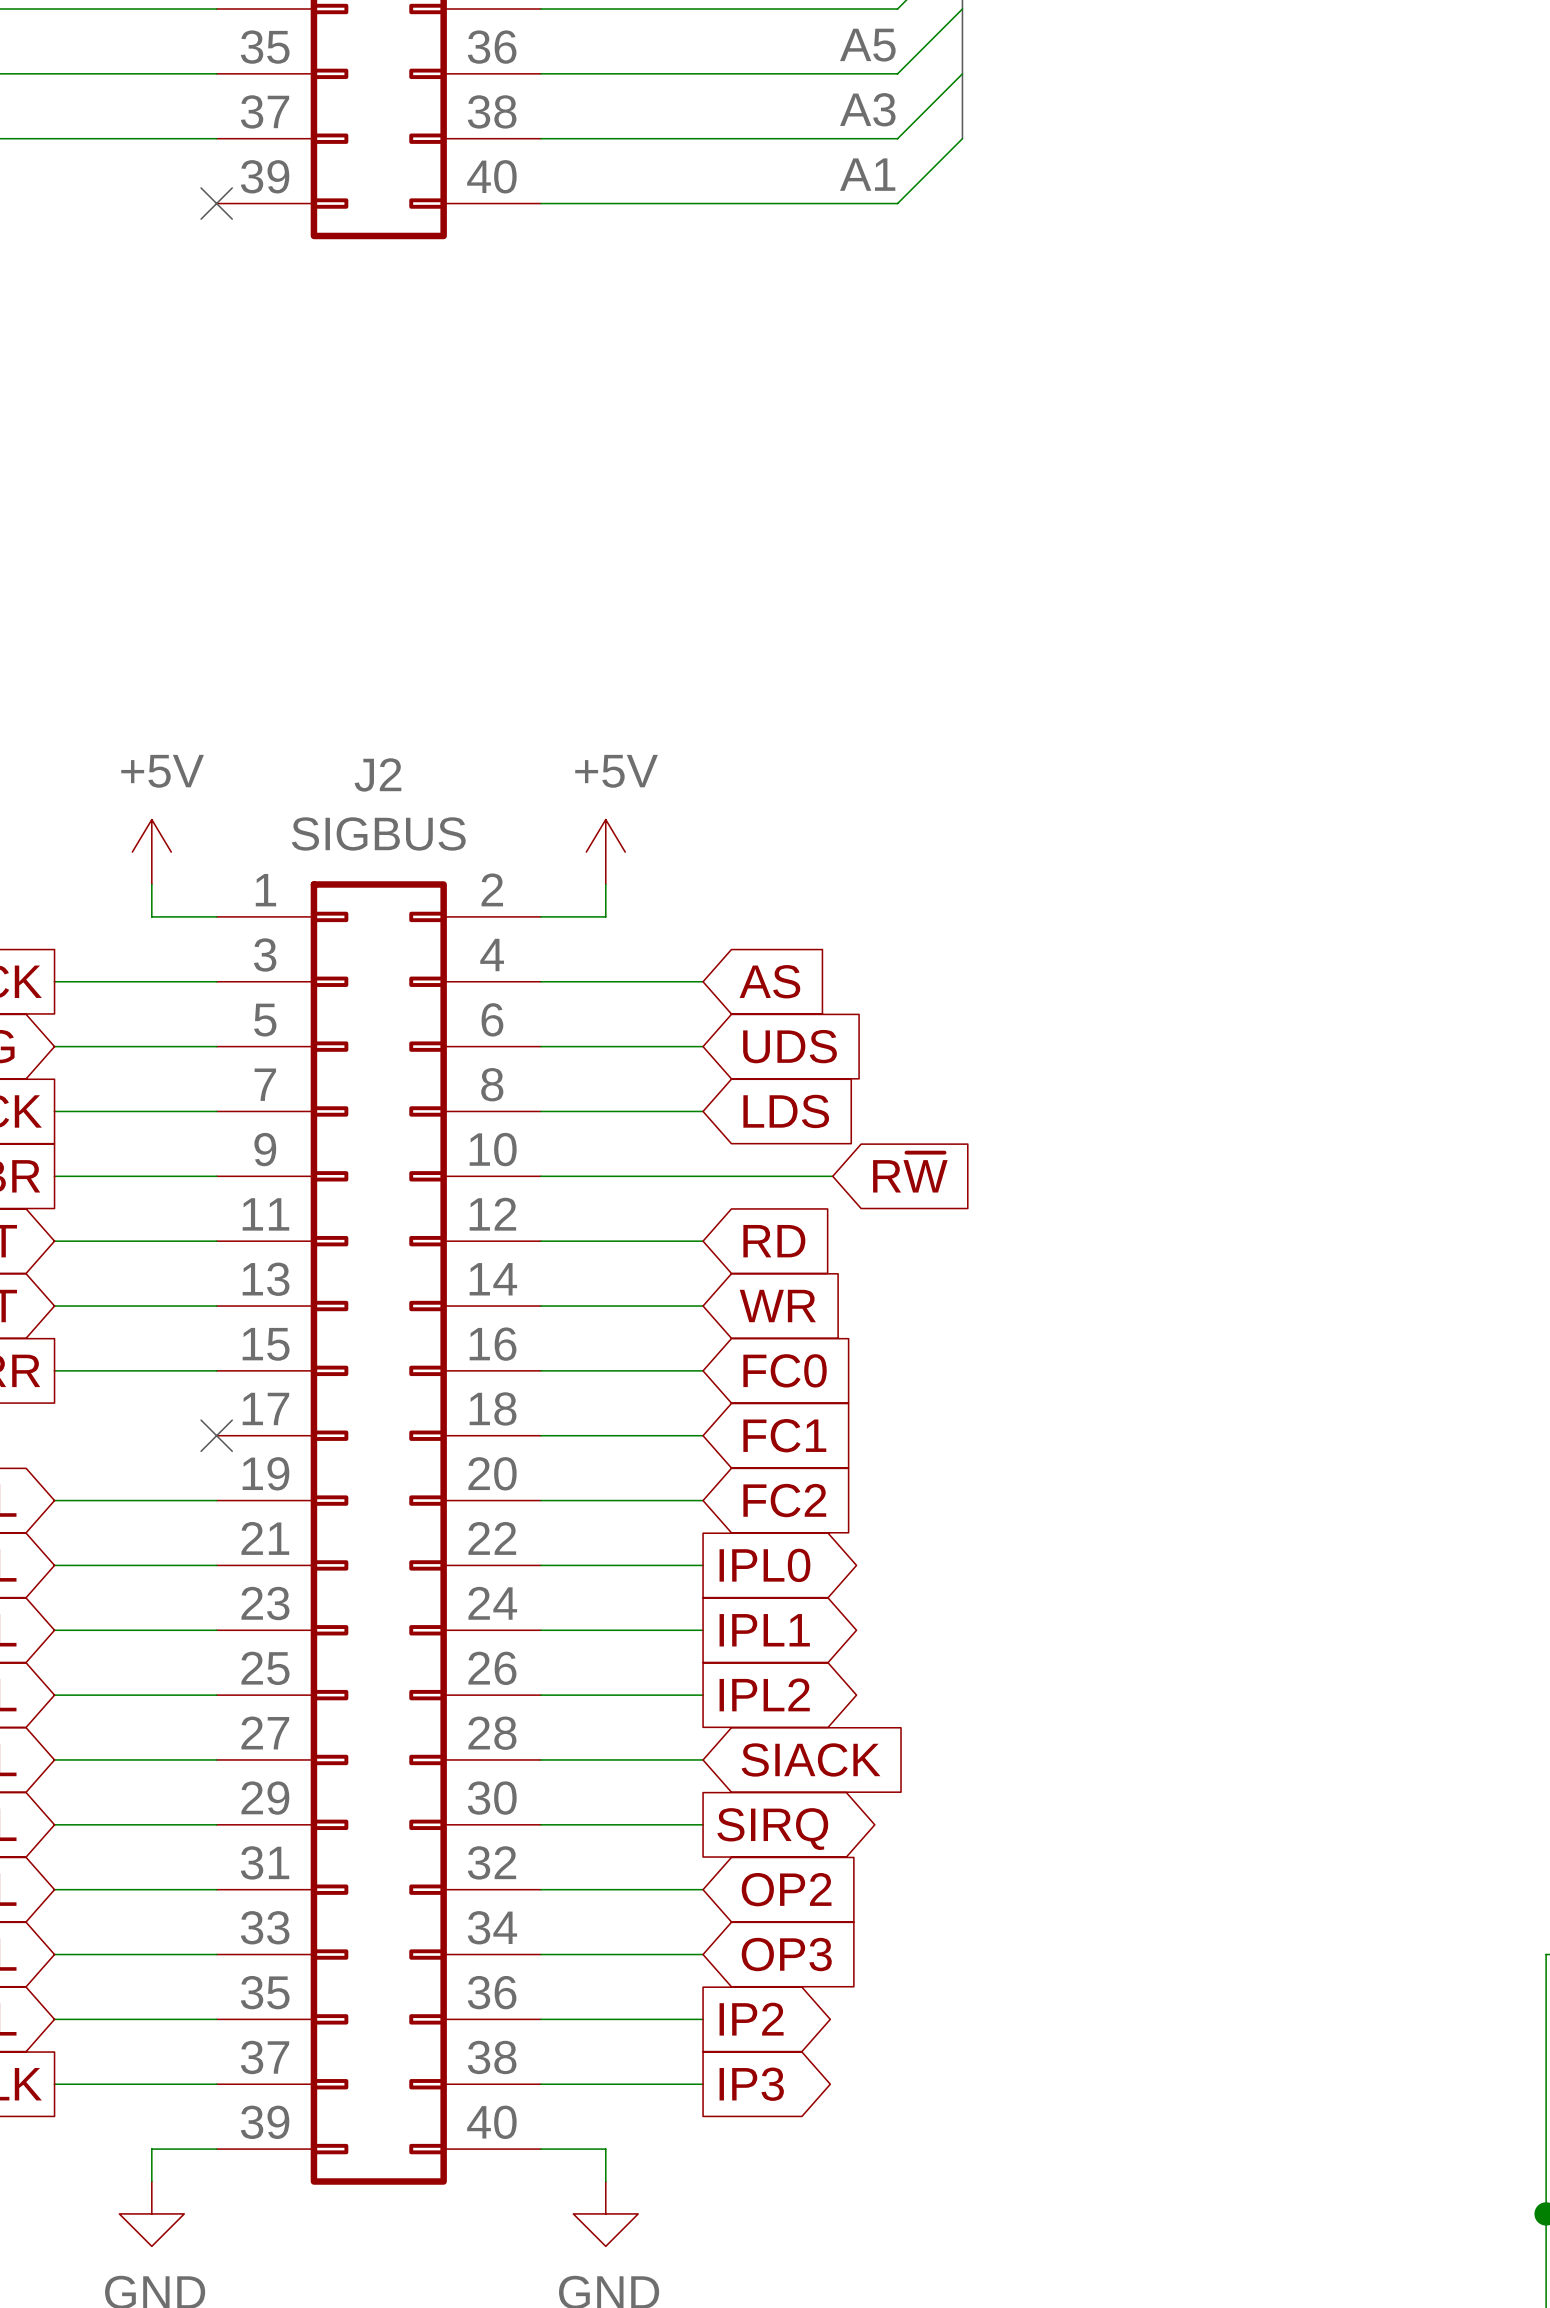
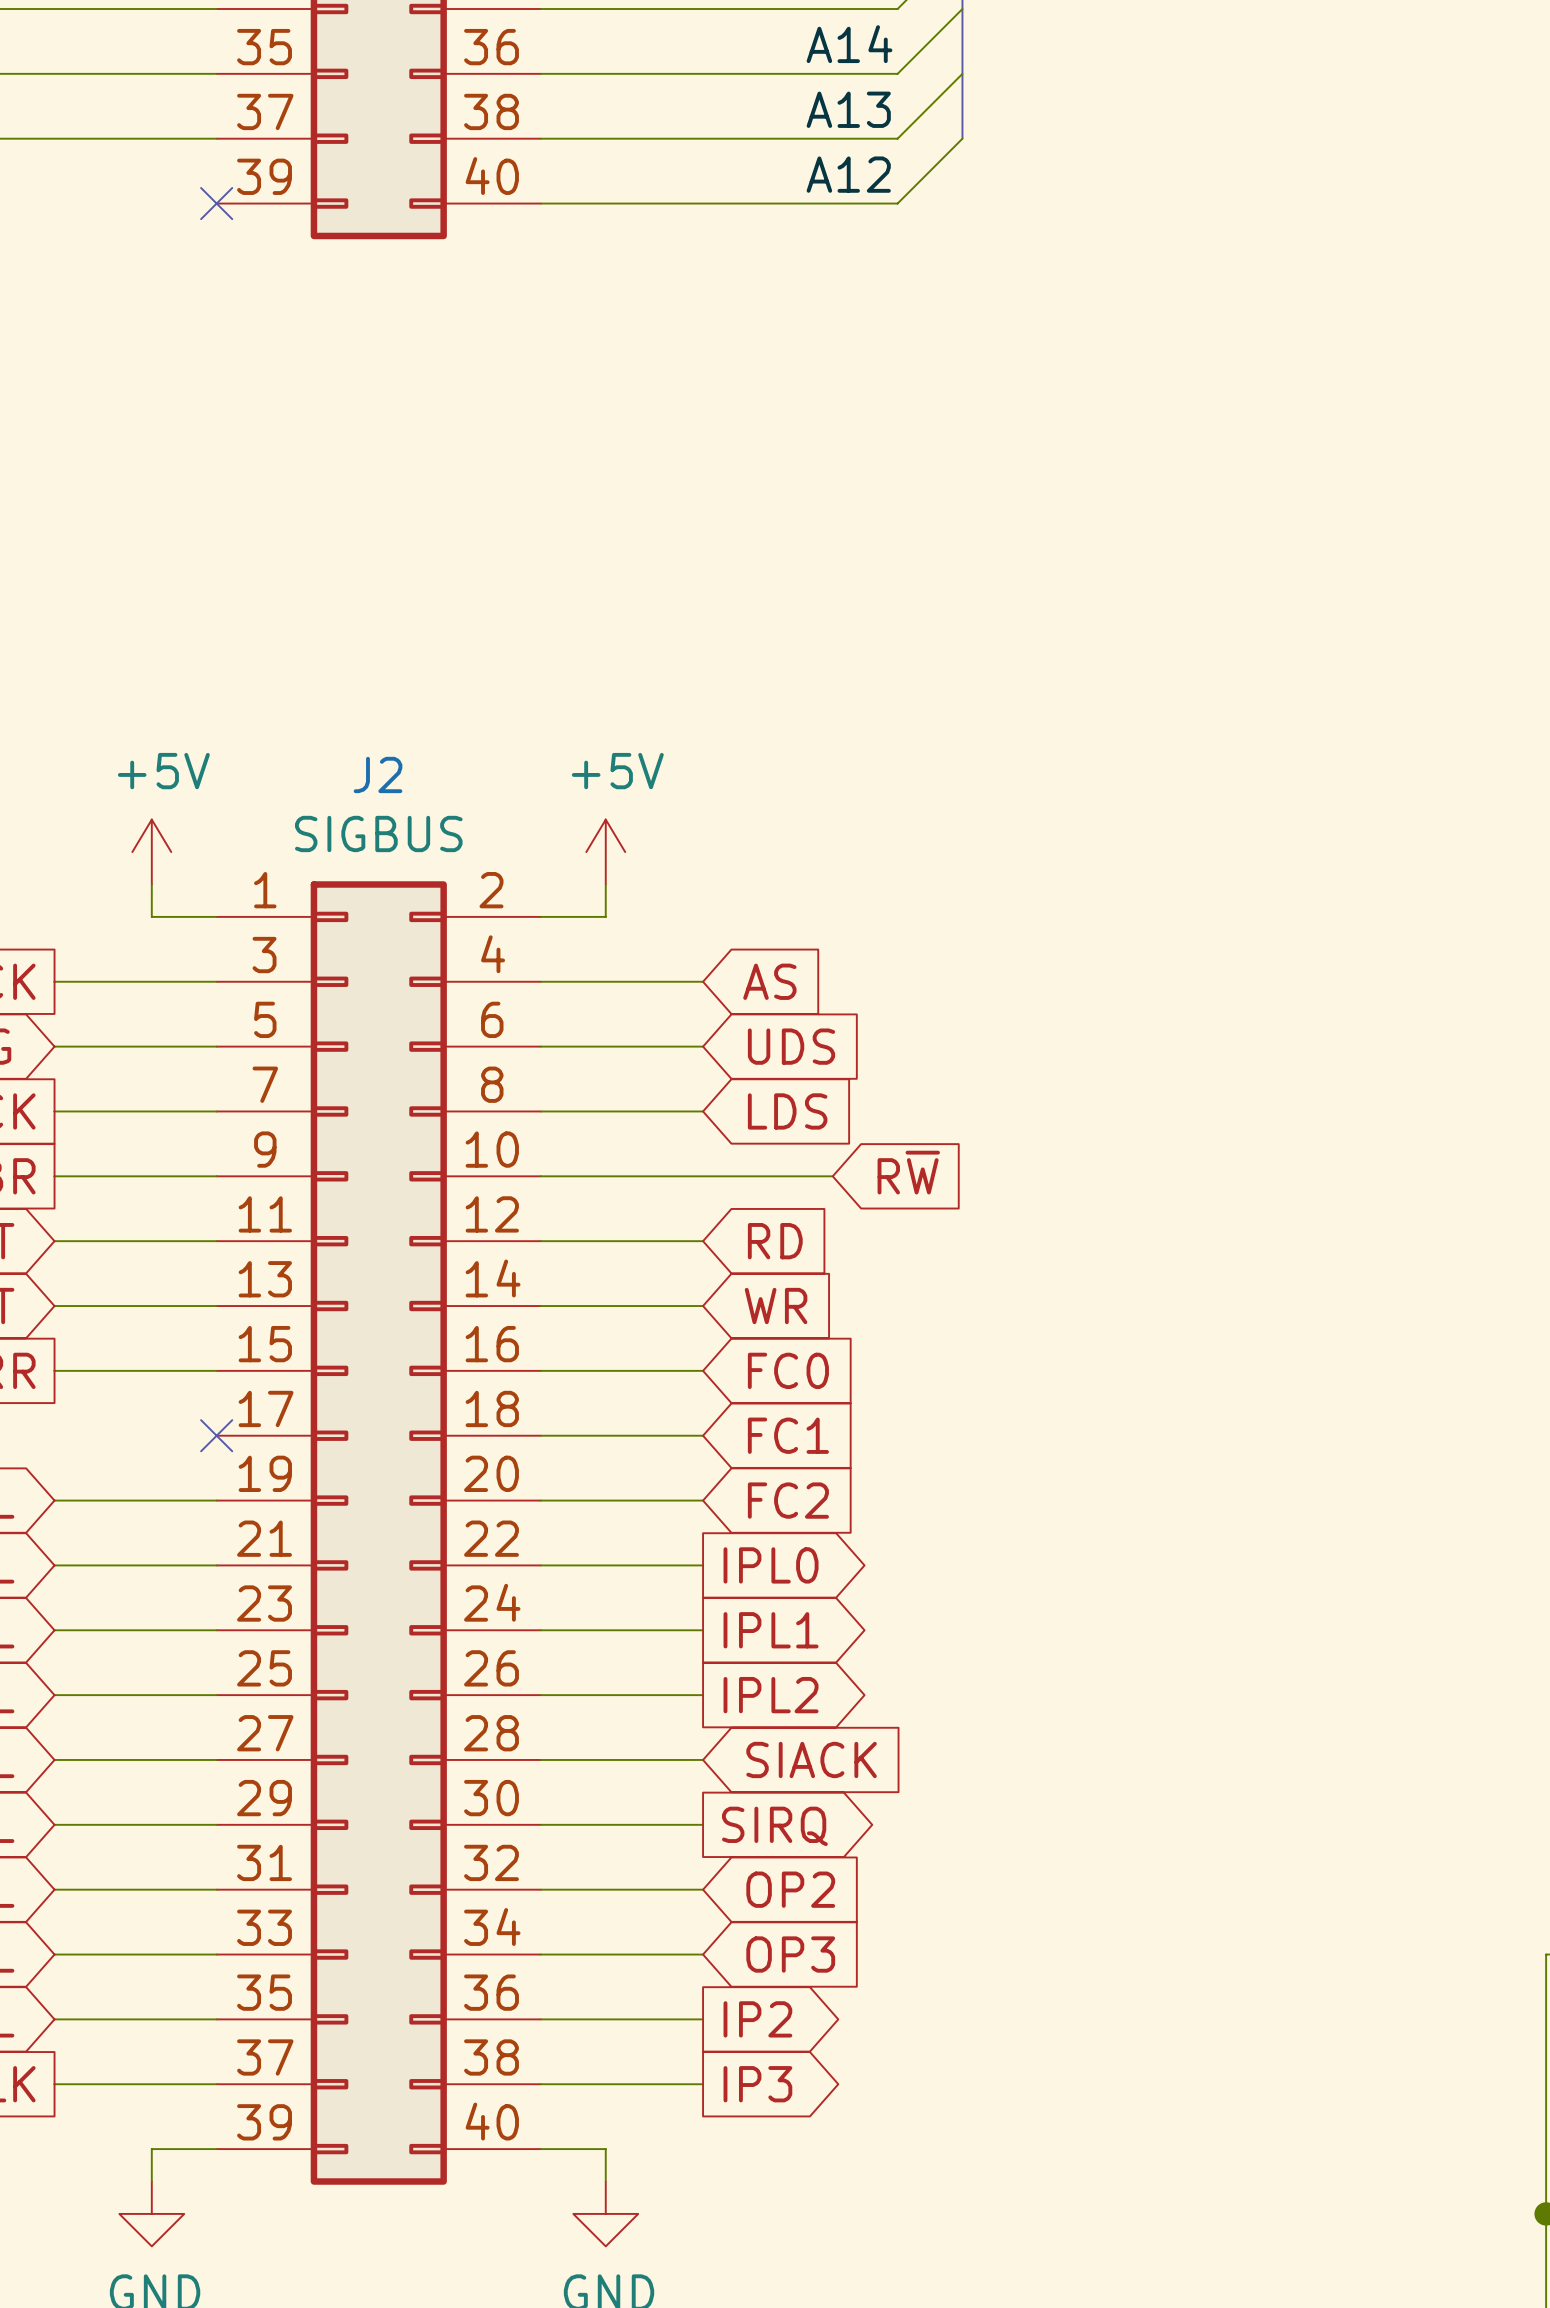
label: A5 (867, 45) -> A14 (849, 44)
label: A3 (867, 109) -> A13 (848, 109)
label: A1 (867, 174) -> A12 (848, 174)

